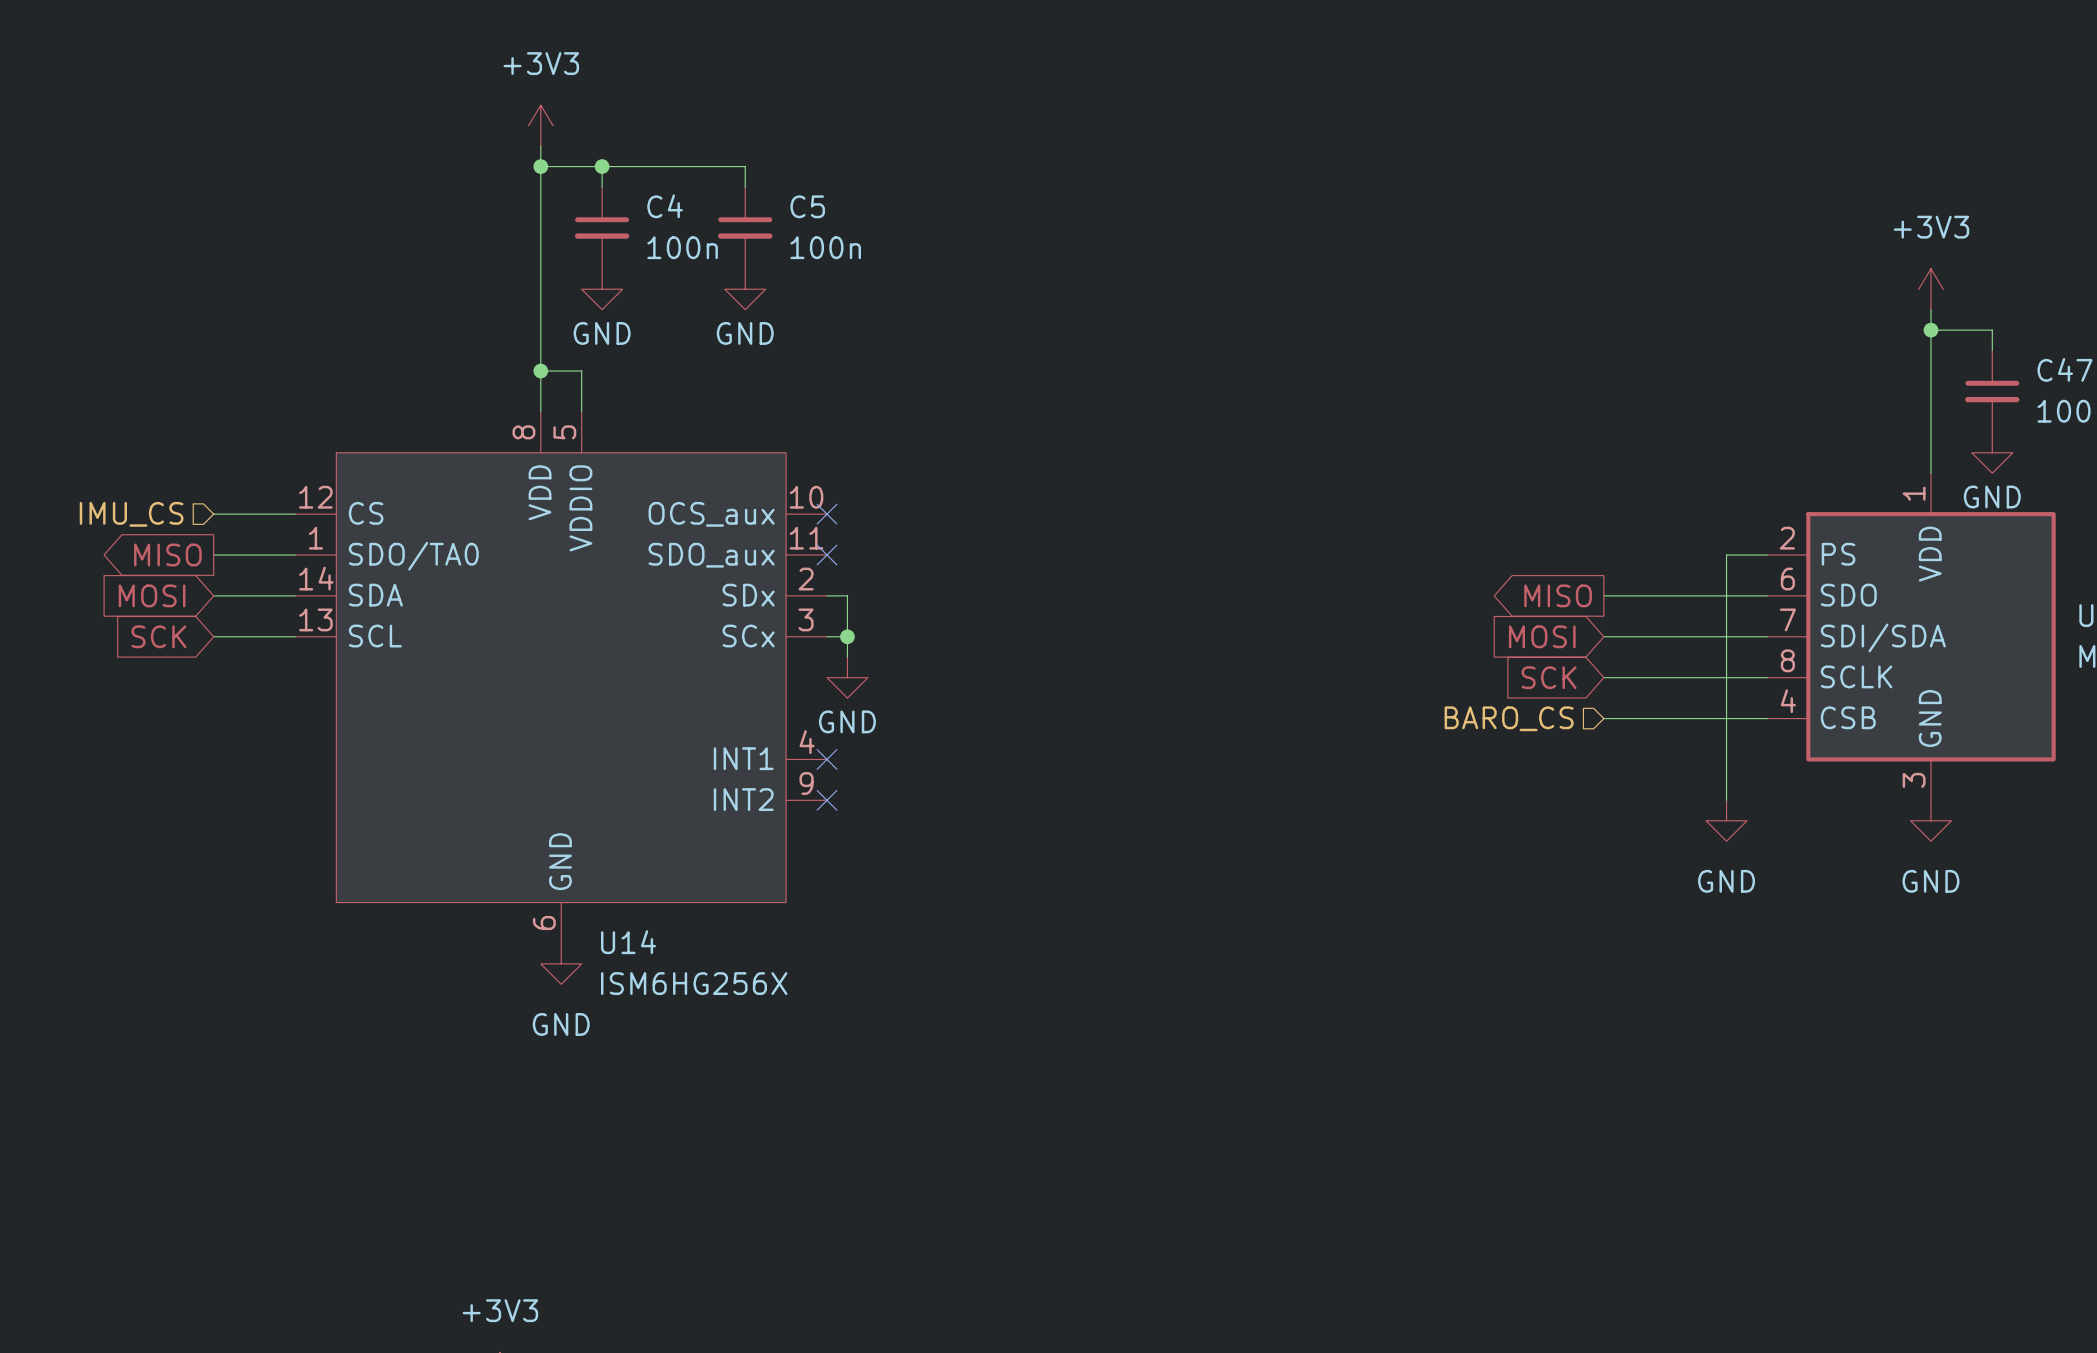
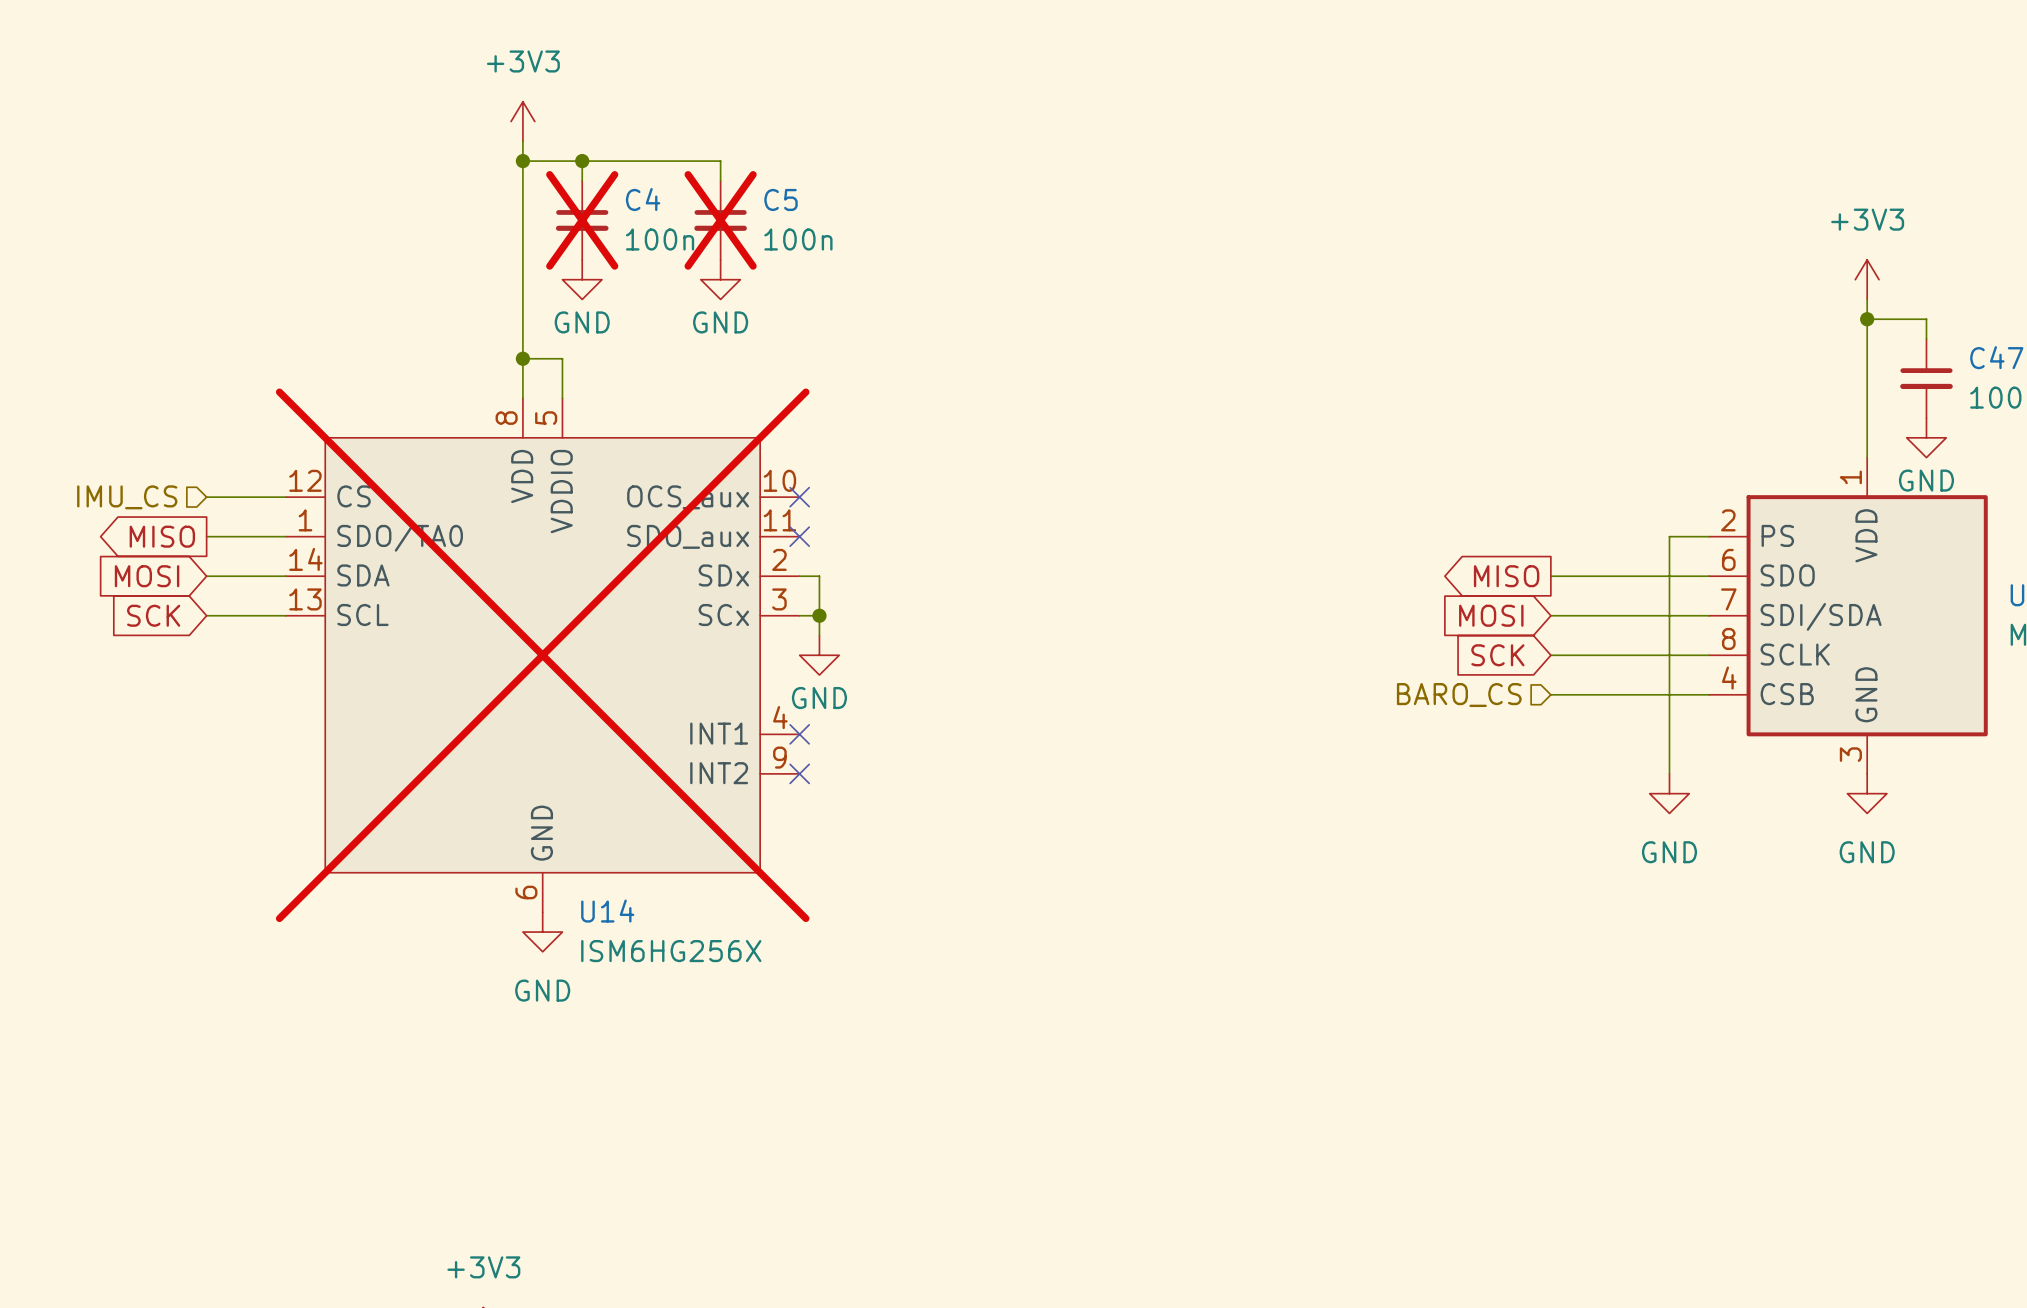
C4 do-not-place cross: none -> (582, 220)
C5 do-not-place cross: none -> (720, 220)
U14 do-not-place cross: none -> (542, 655)

